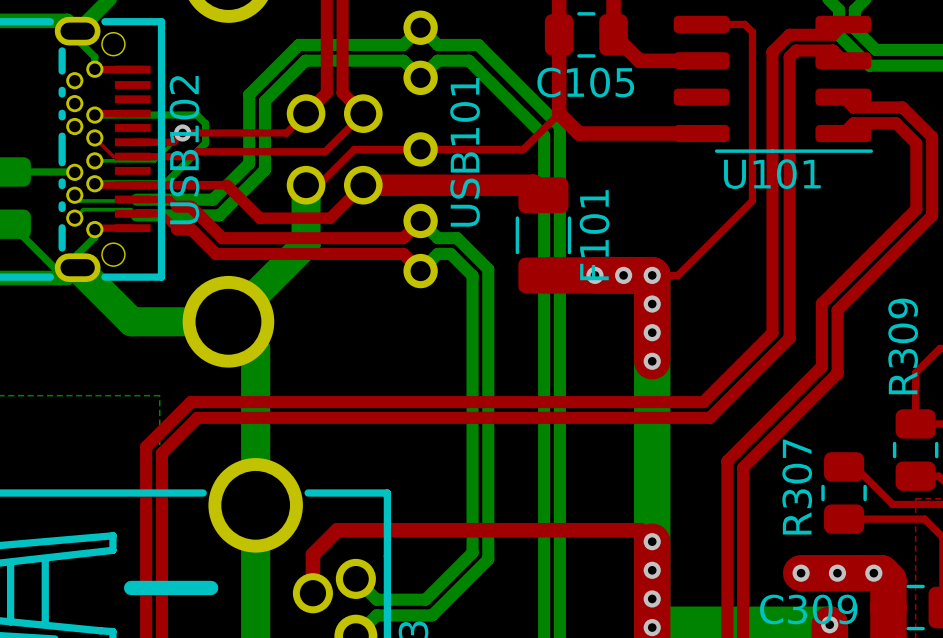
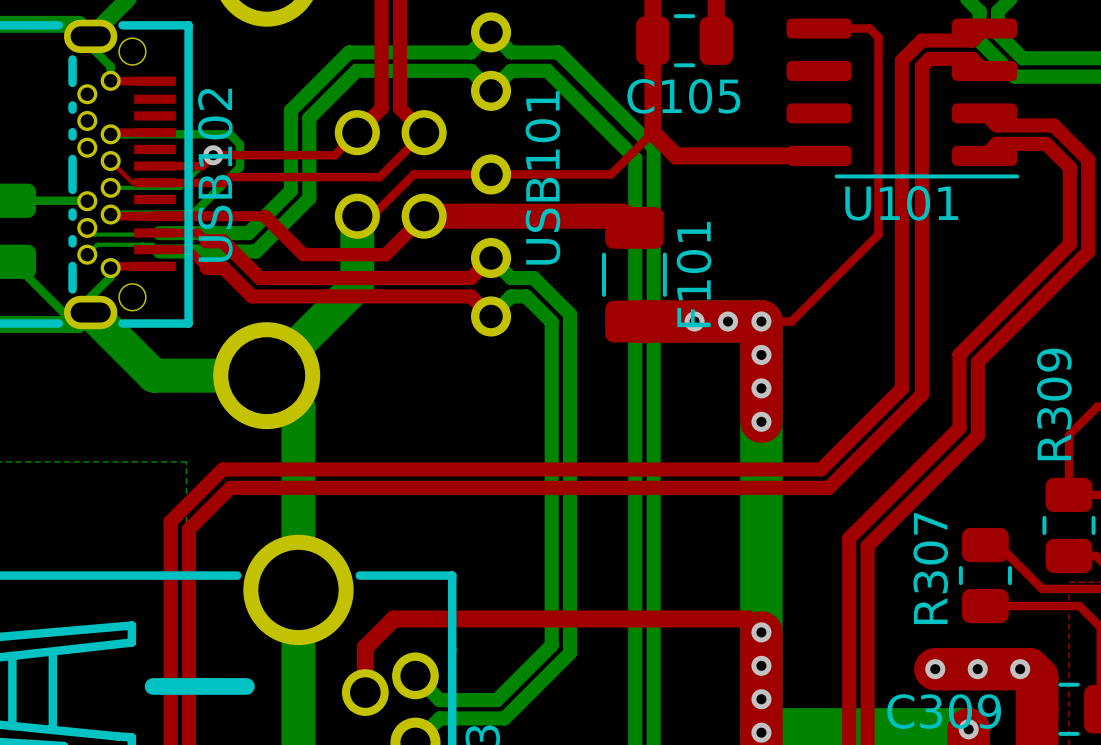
top track: (613, 34) (639, 60) (701, 60) -> none

